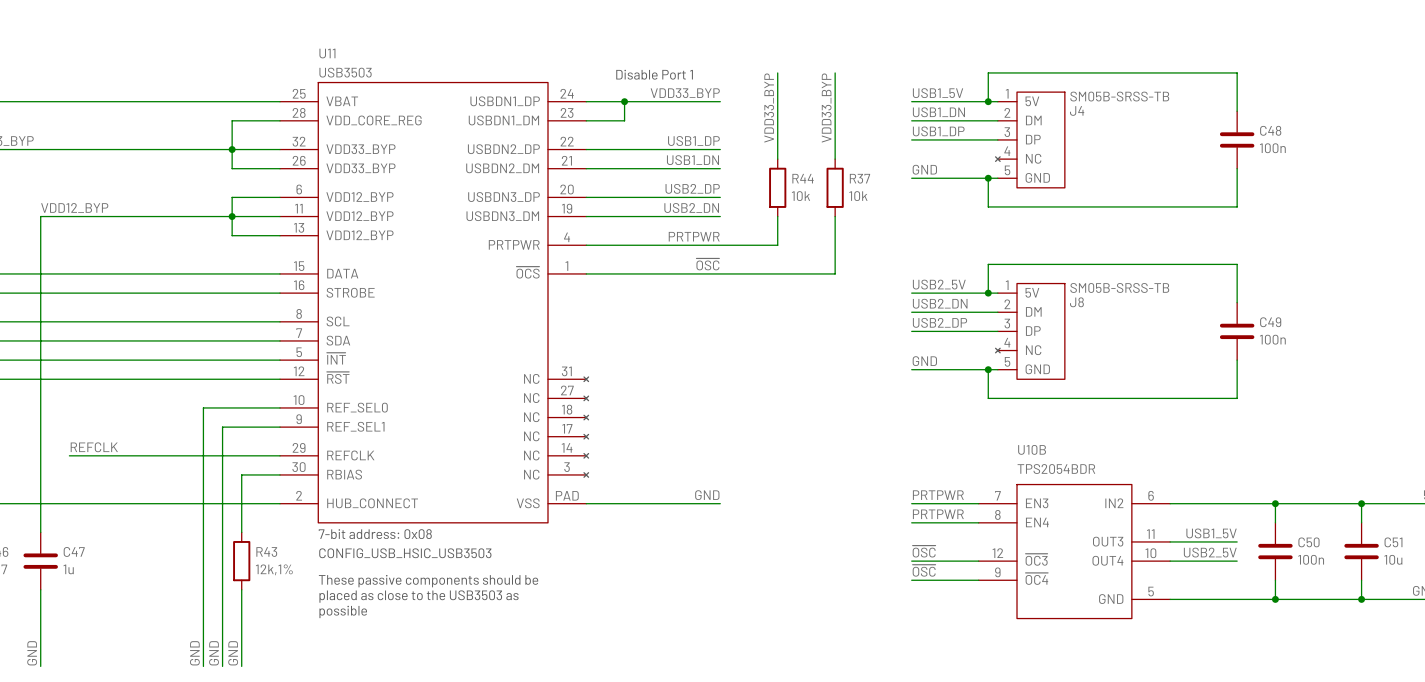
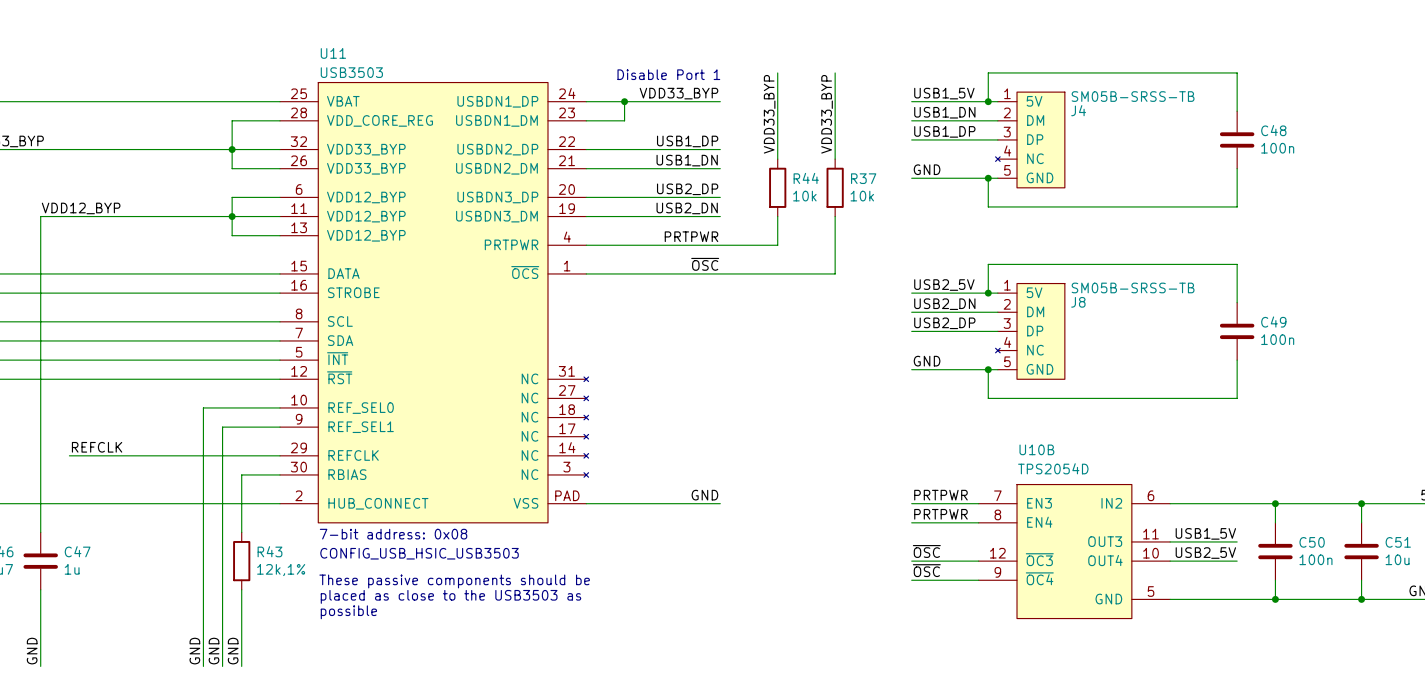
U10B value: TPS2054BDR (1056, 469) -> TPS2054D (1053, 468)

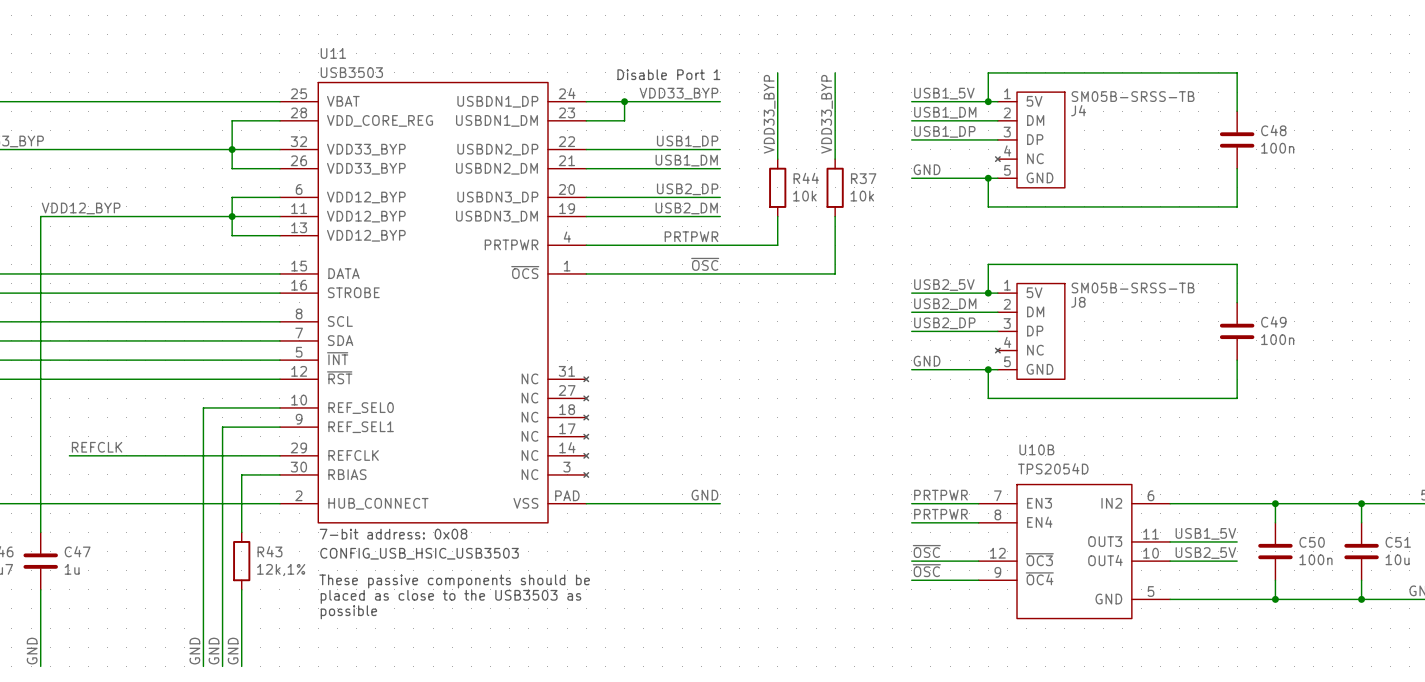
label: USB1_DN (944, 112) -> USB1_DM (945, 112)
label: USB1_DN (687, 160) -> USB1_DM (686, 160)
label: USB2_DN (687, 208) -> USB2_DM (686, 208)
label: USB2_DN (944, 304) -> USB2_DM (945, 304)

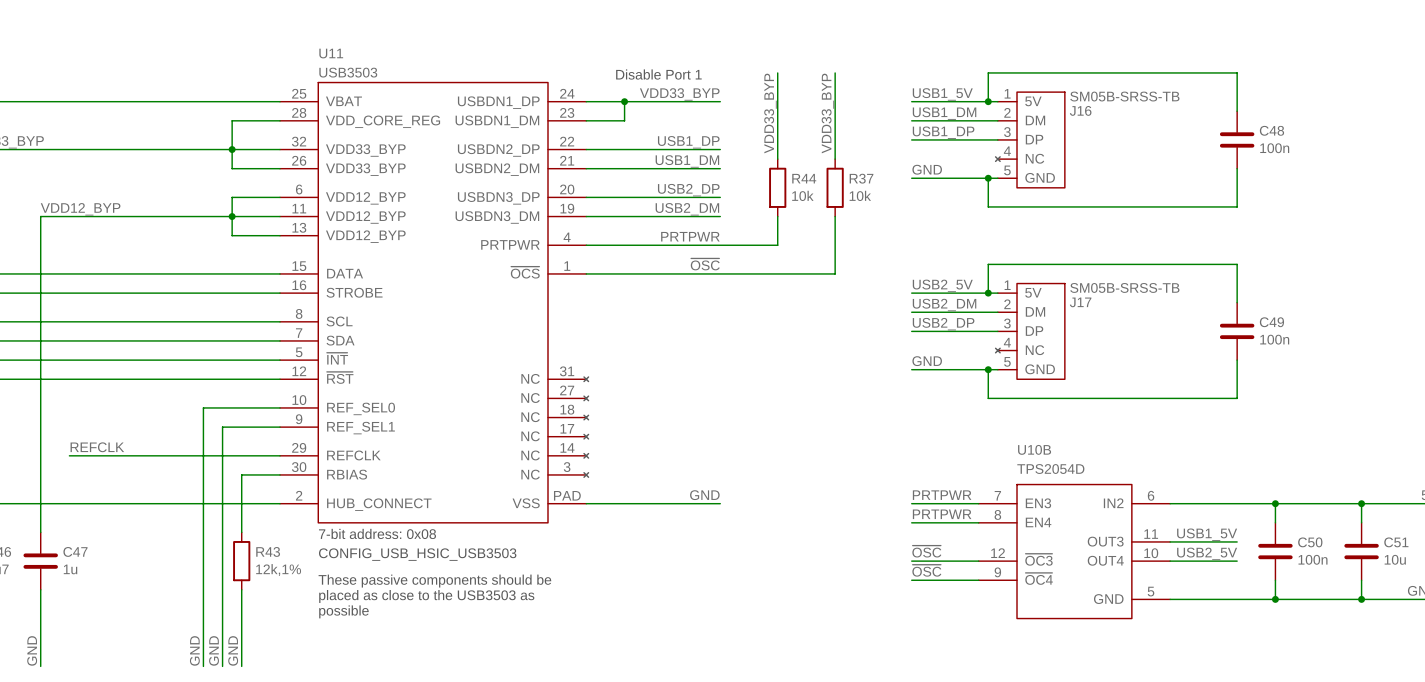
J4 name: J4 (1078, 110) -> J16 (1080, 110)
J8 name: J8 (1078, 302) -> J17 (1080, 302)

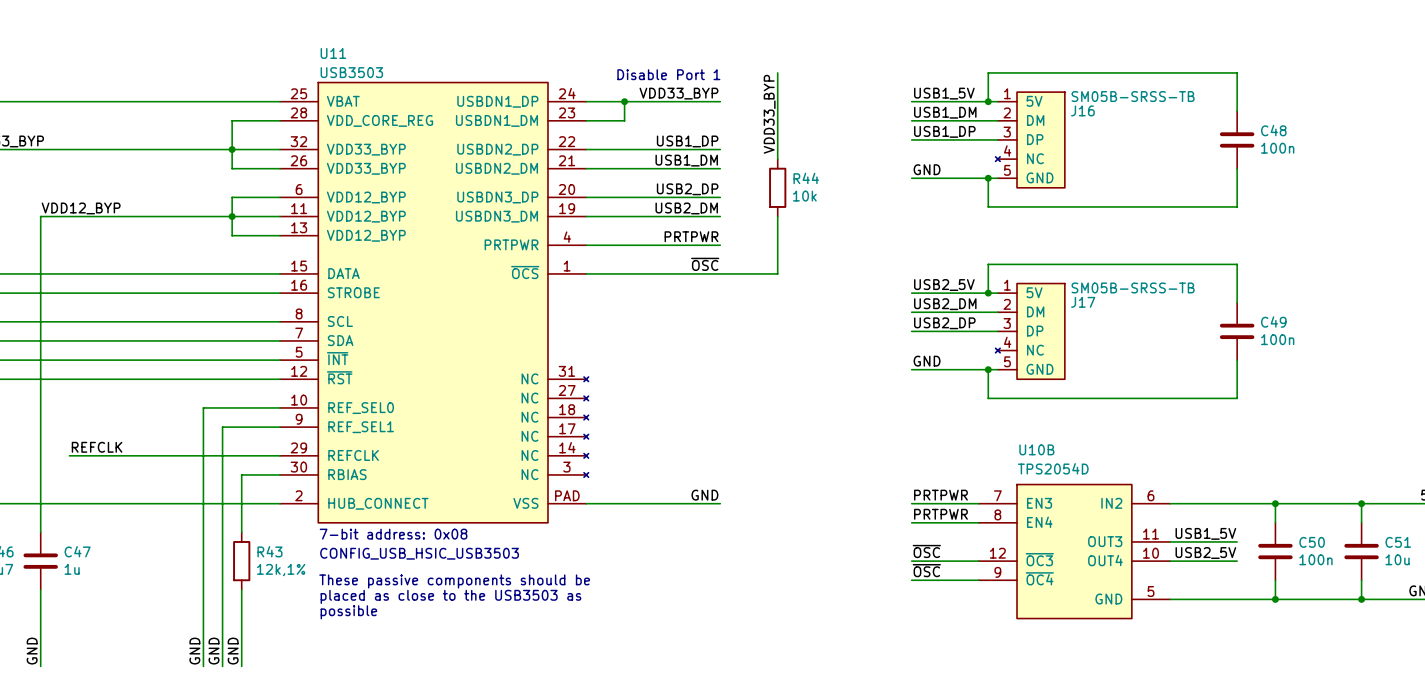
wire: (835, 72) (835, 159) -> none
label: VDD33_BYP (827, 113) -> none
R37: 10k (835, 187) -> none
wire: (835, 216) (835, 273) (777, 273) -> (777, 245) (777, 273)
wire: (720, 245) (777, 245) -> none

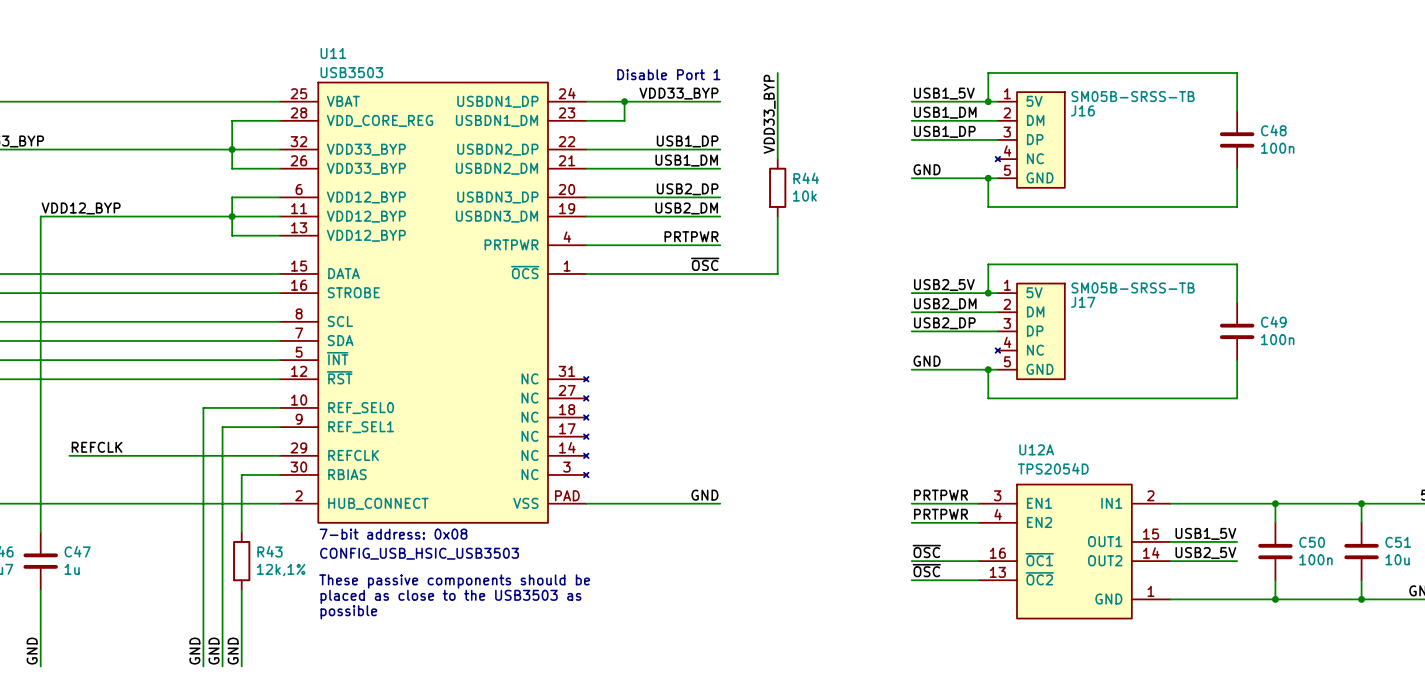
U10B name: U10B (1036, 449) -> U12A (1036, 449)
U10B symbol: [978, 484, 1171, 619] -> [978, 484, 1171, 619]

